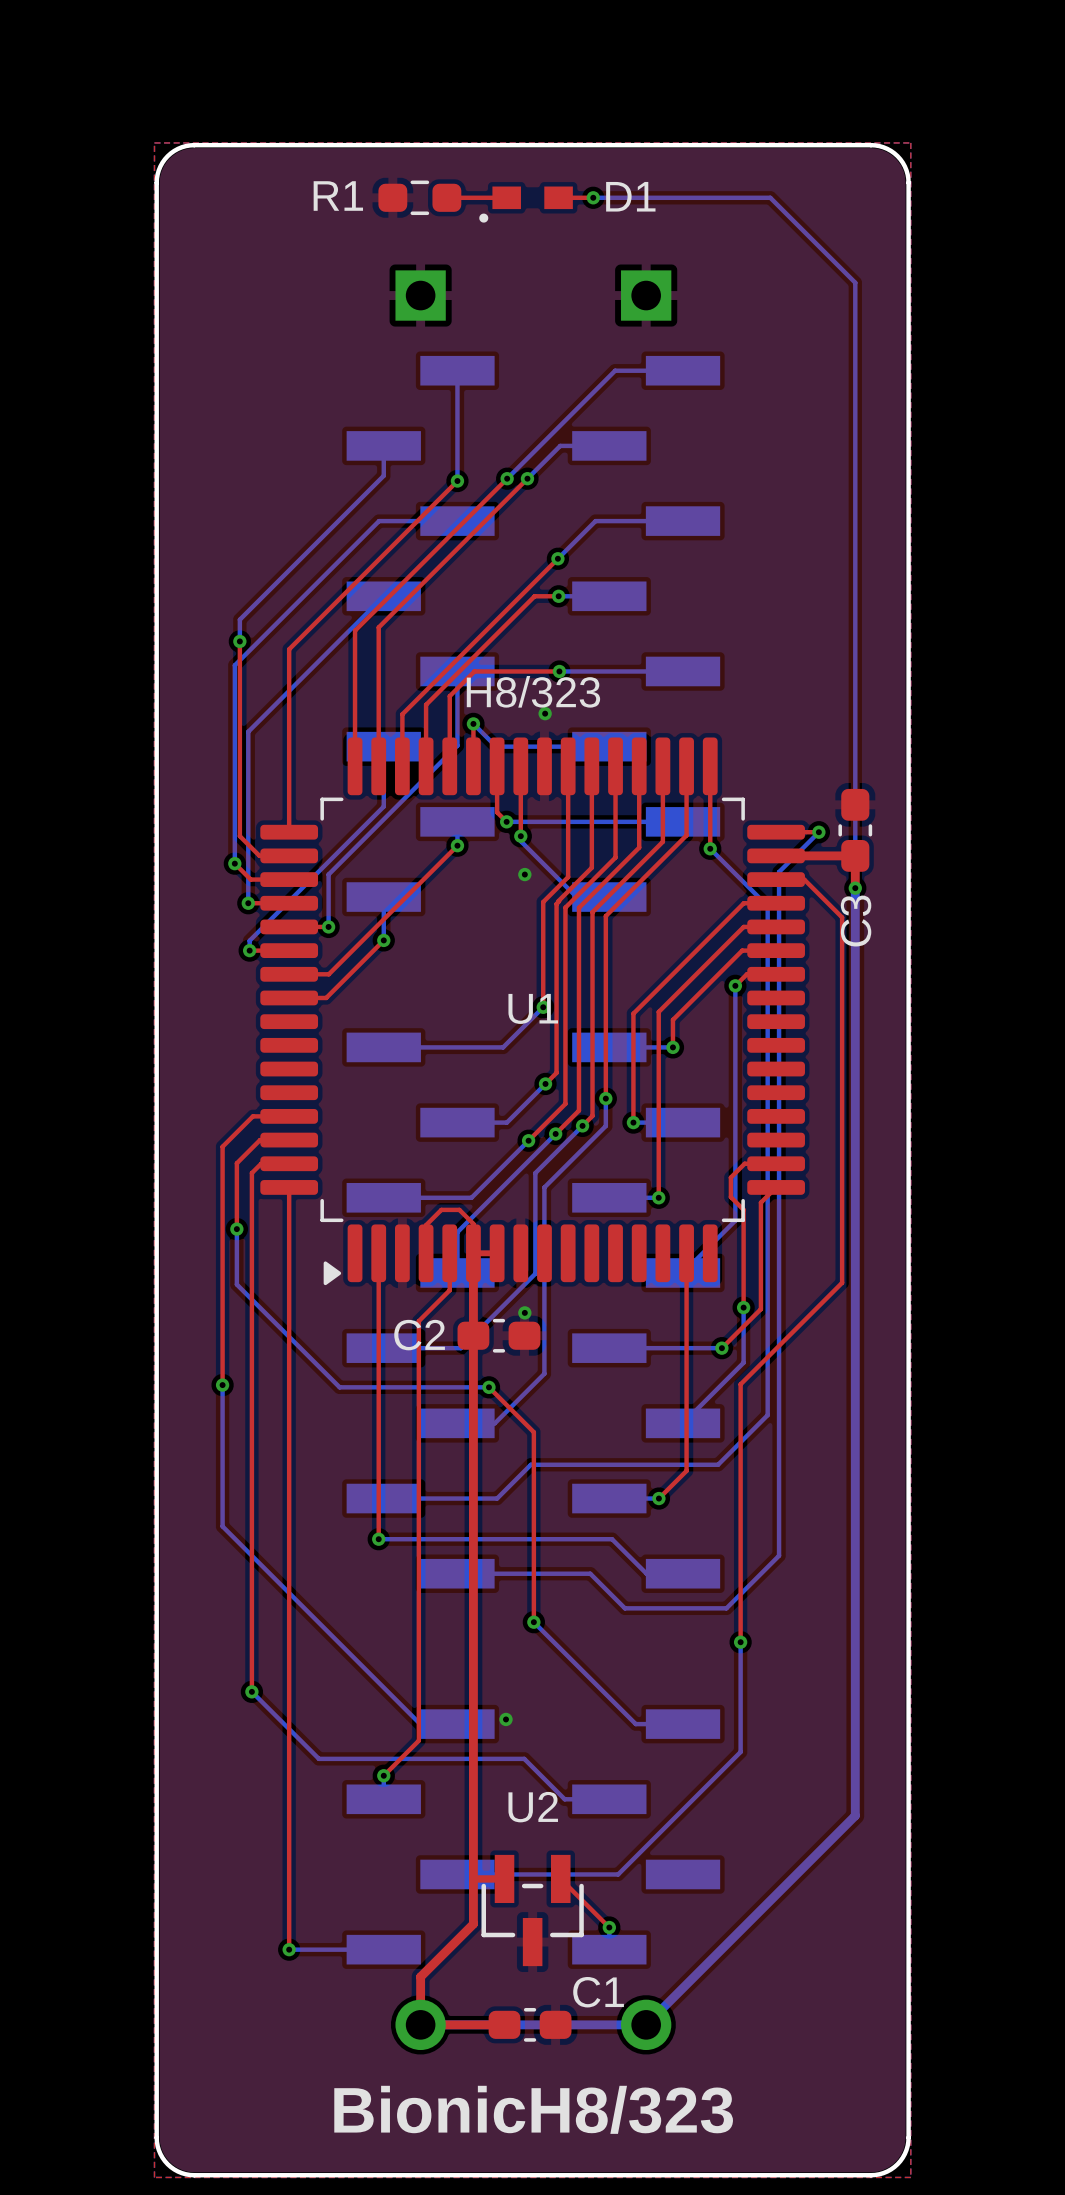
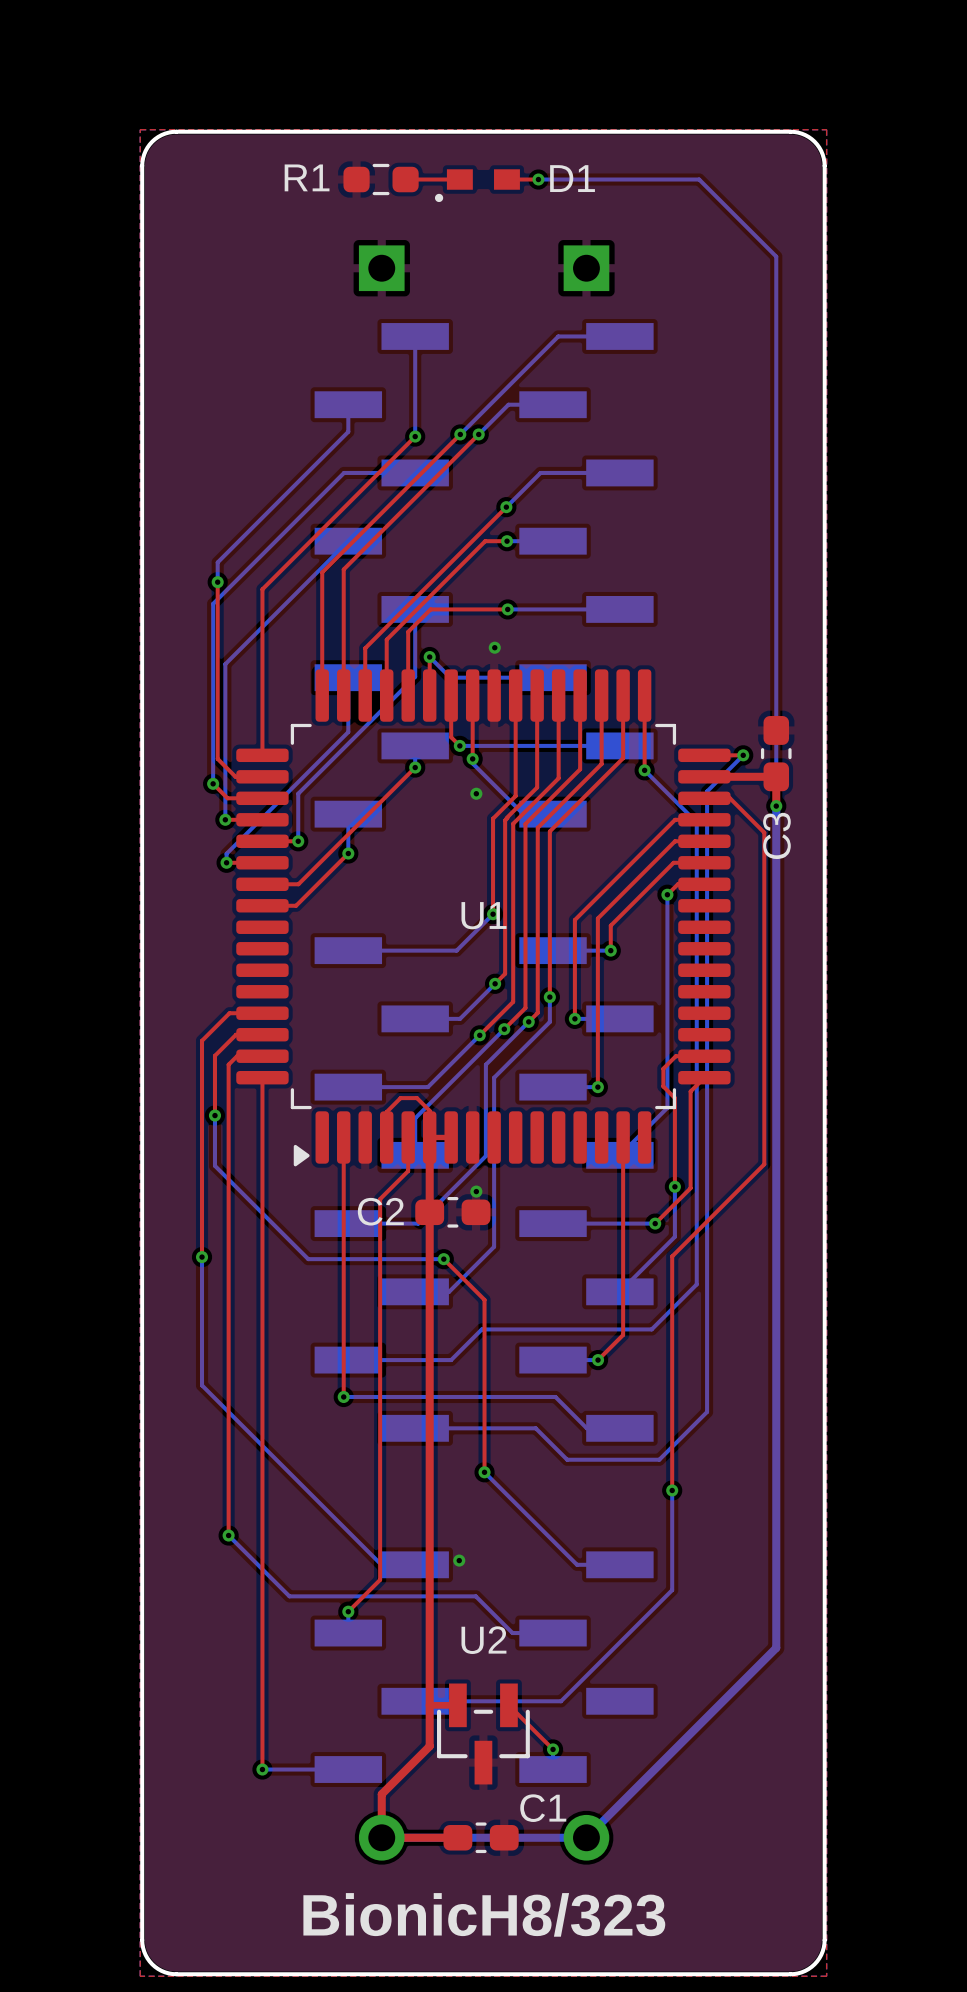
text: H8/323 (533, 691) -> none

